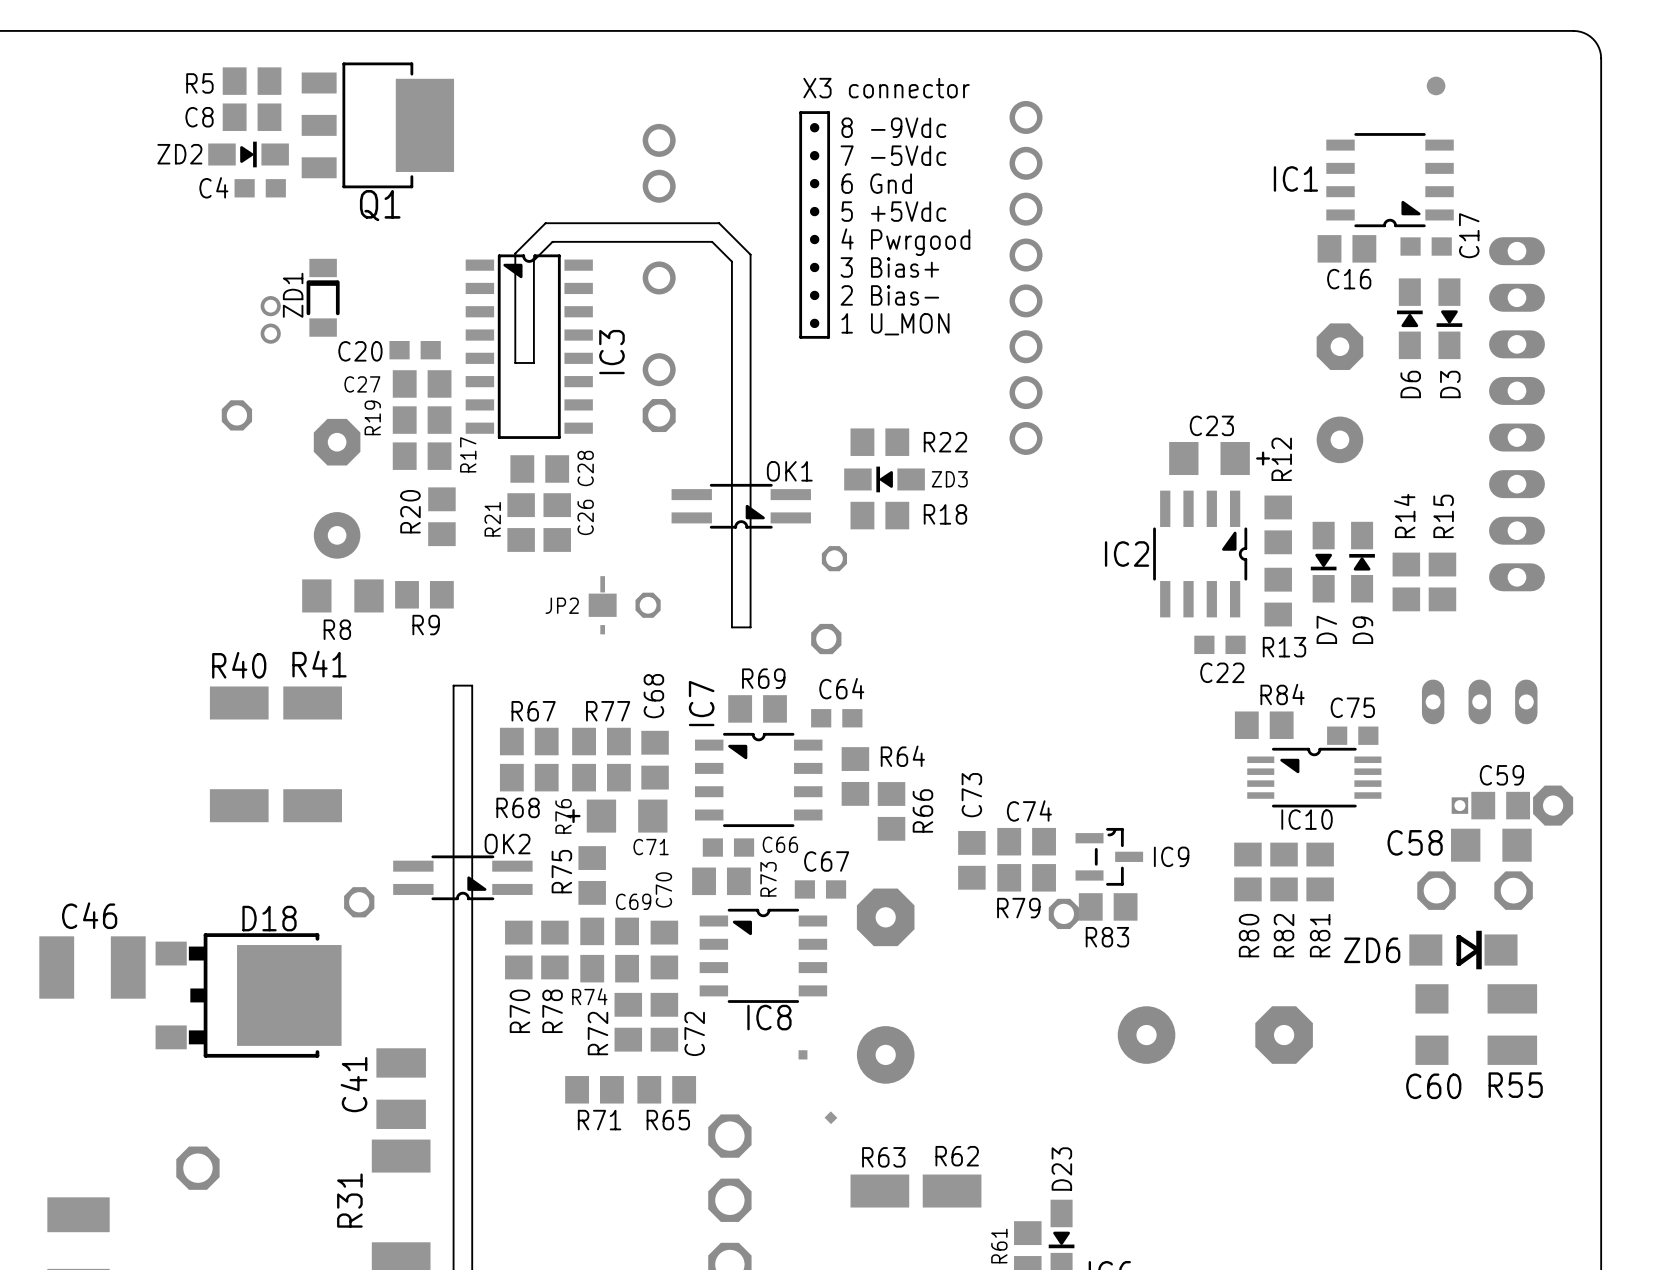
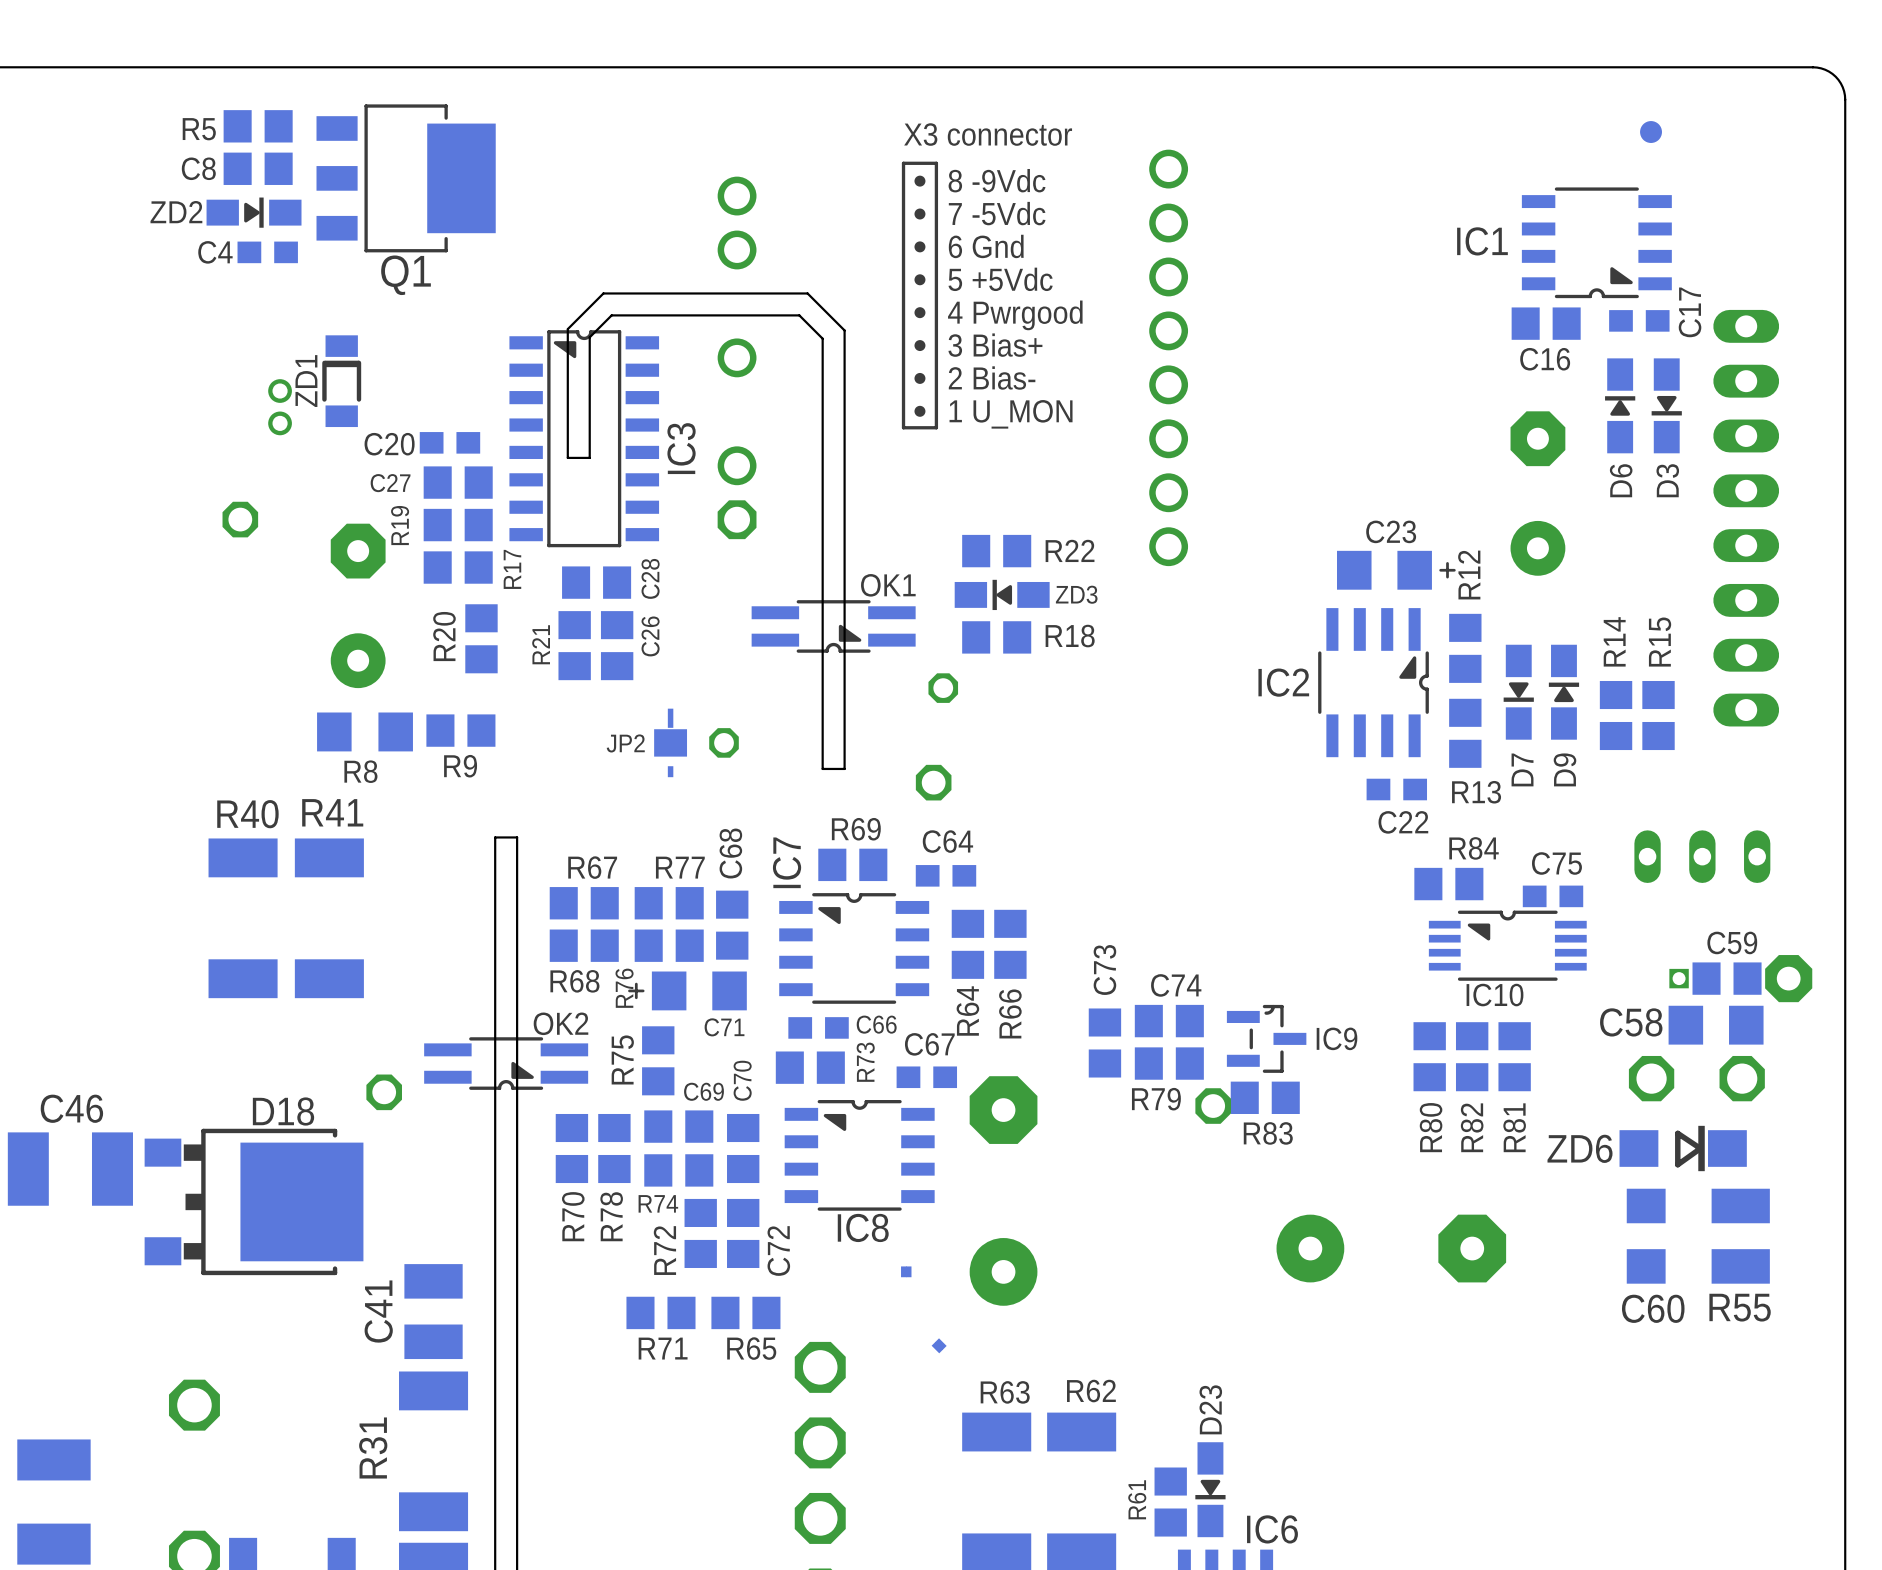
R64 name rotation: 0° (902, 756) -> 90° counterclockwise (967, 1011)
R64 name position: R64 (902, 756) -> R64 (967, 1011)
R66 name position: R66 (922, 810) -> R66 (1010, 1013)
R66 position: (891, 811) -> (1010, 944)

